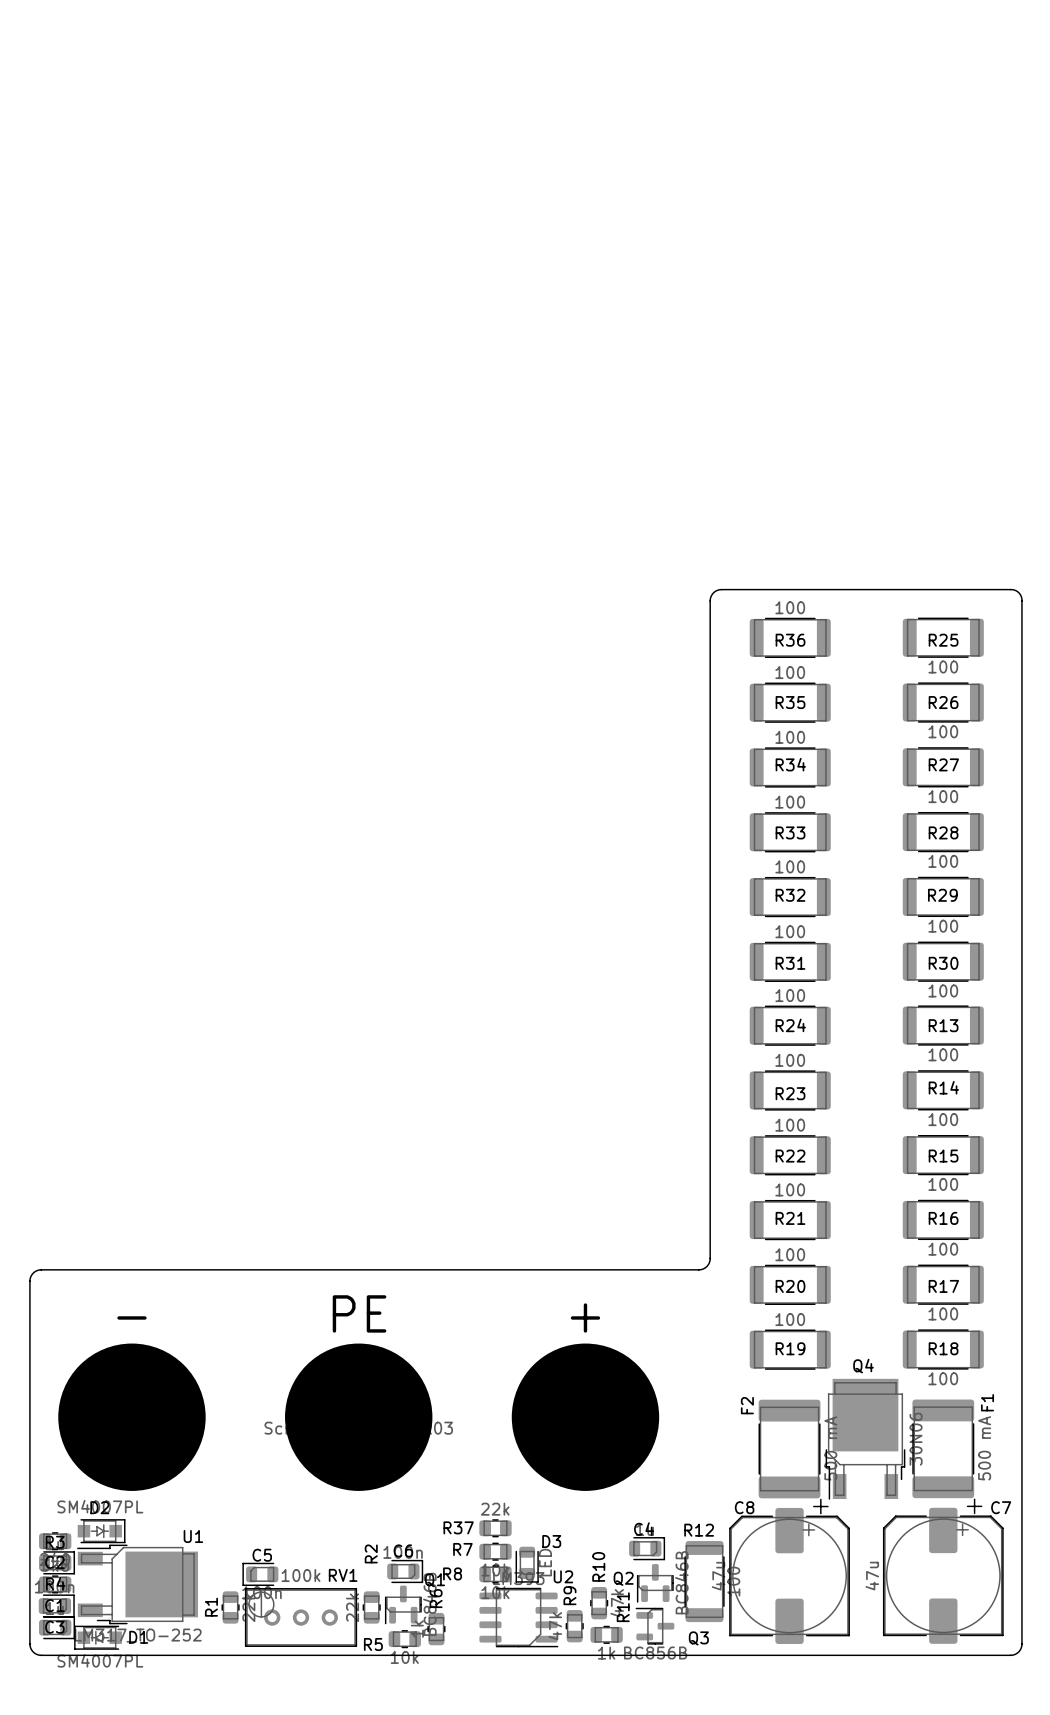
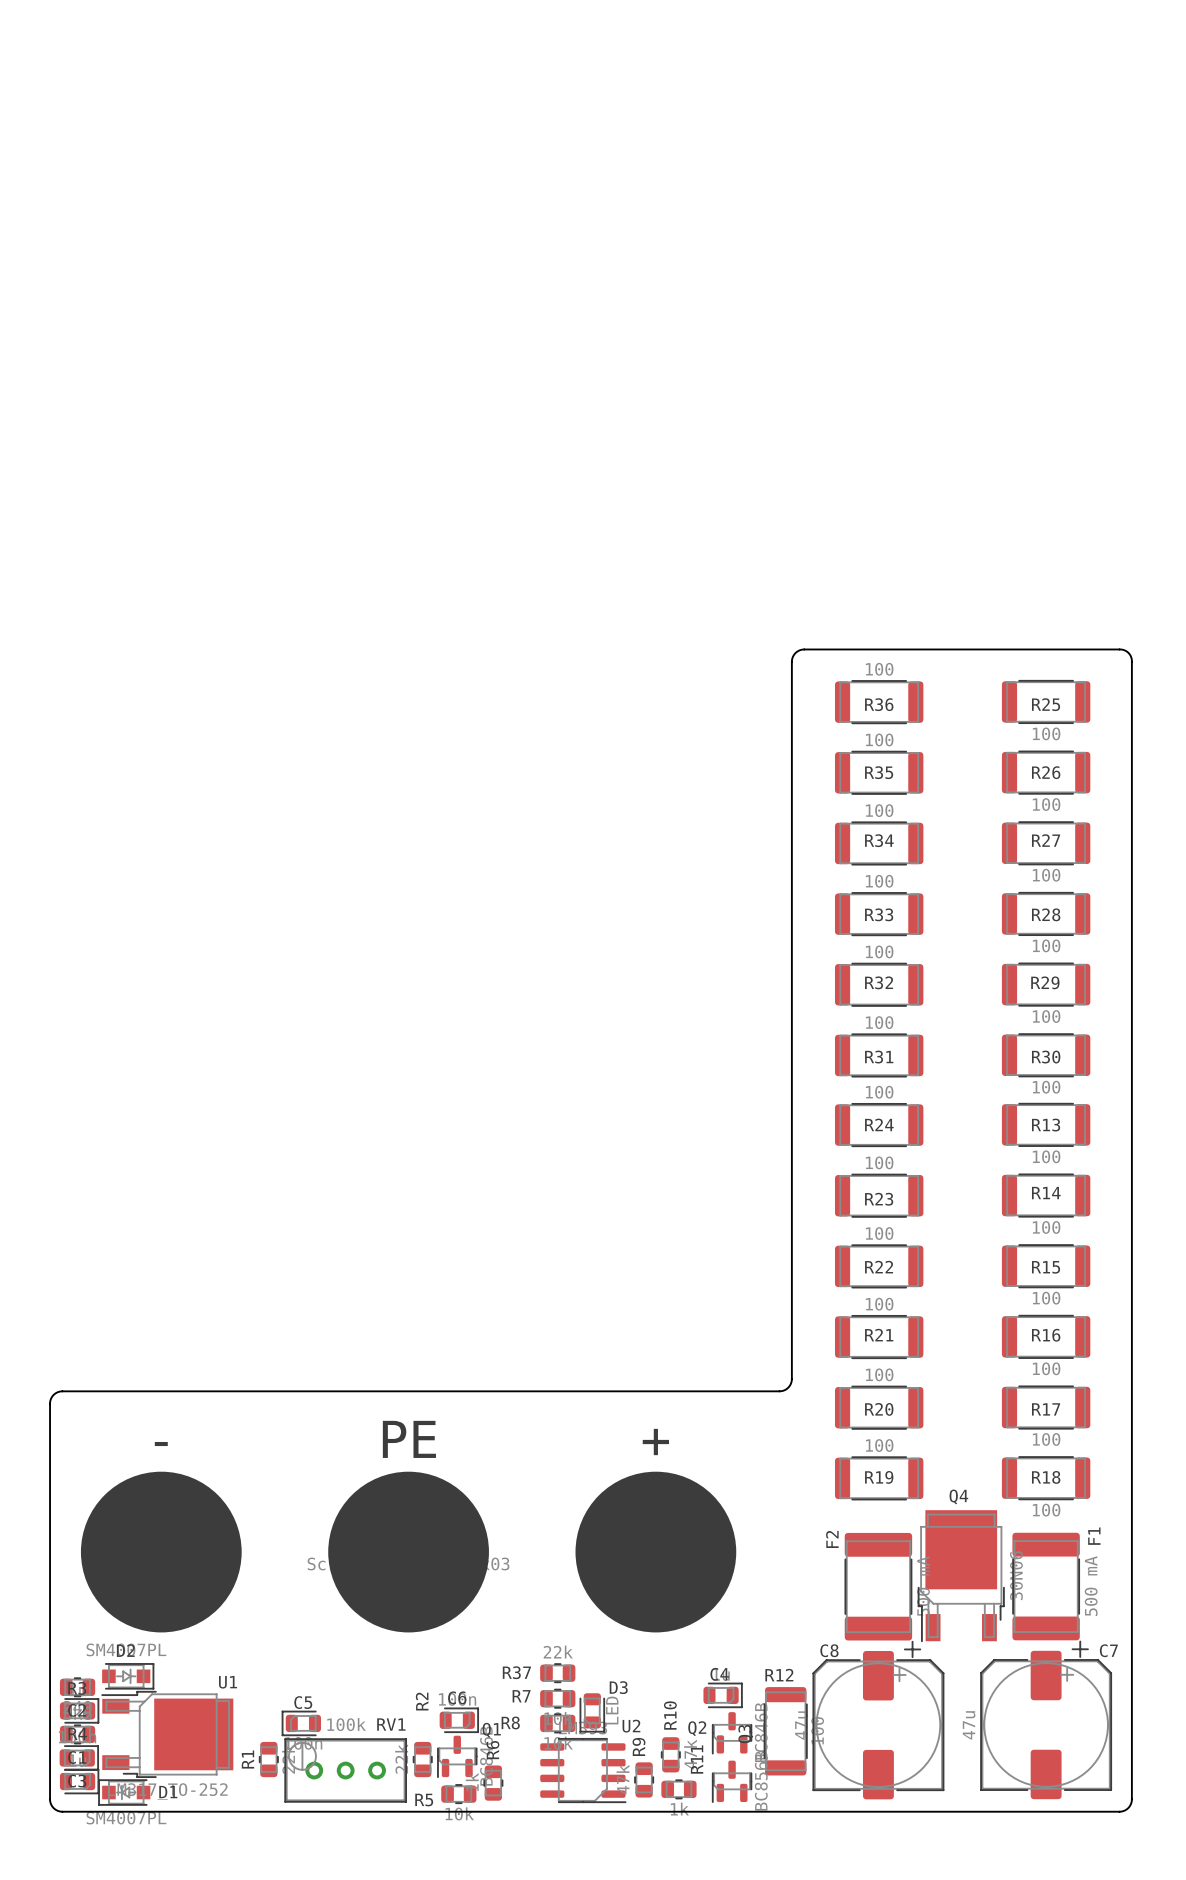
Q3 rotation: 0° (654, 1626) -> 90° counterclockwise (732, 1781)

